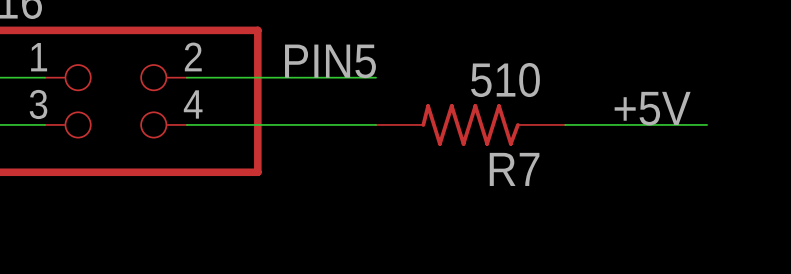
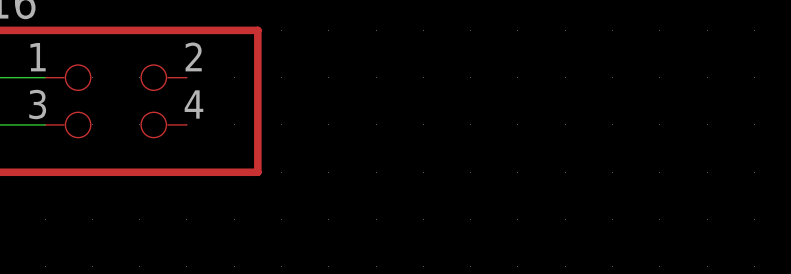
label: PIN5 (330, 61) -> none
wire: (186, 77) (376, 77) -> none
label: +5V (652, 108) -> none
wire: (186, 124) (376, 124) -> none
R7: 510 (470, 124) -> none
wire: (565, 124) (707, 124) -> none

